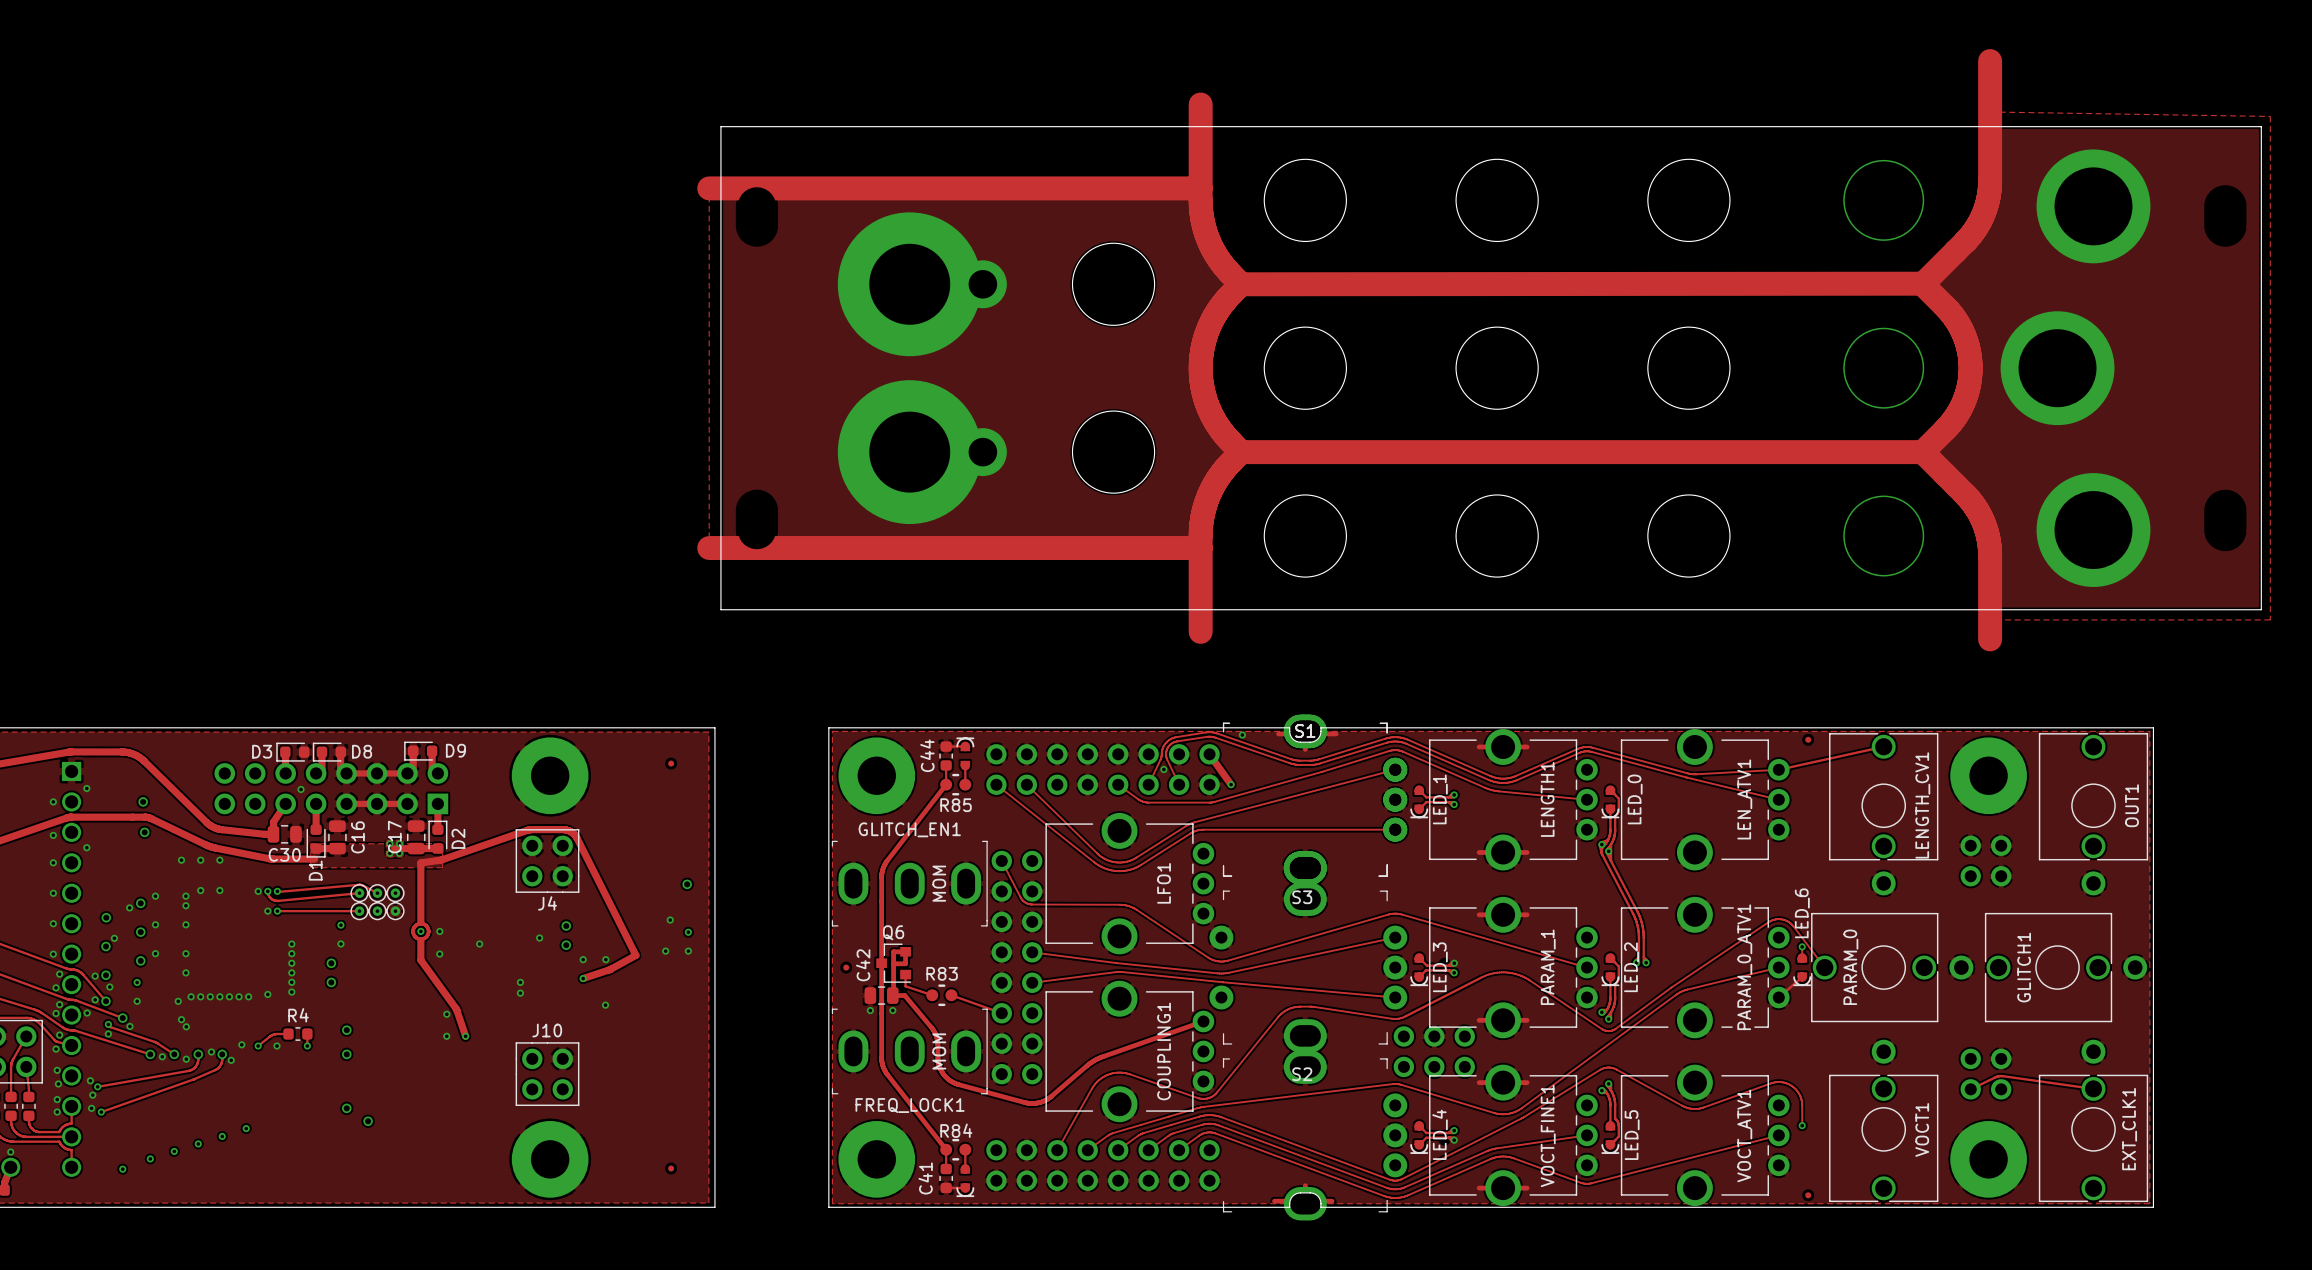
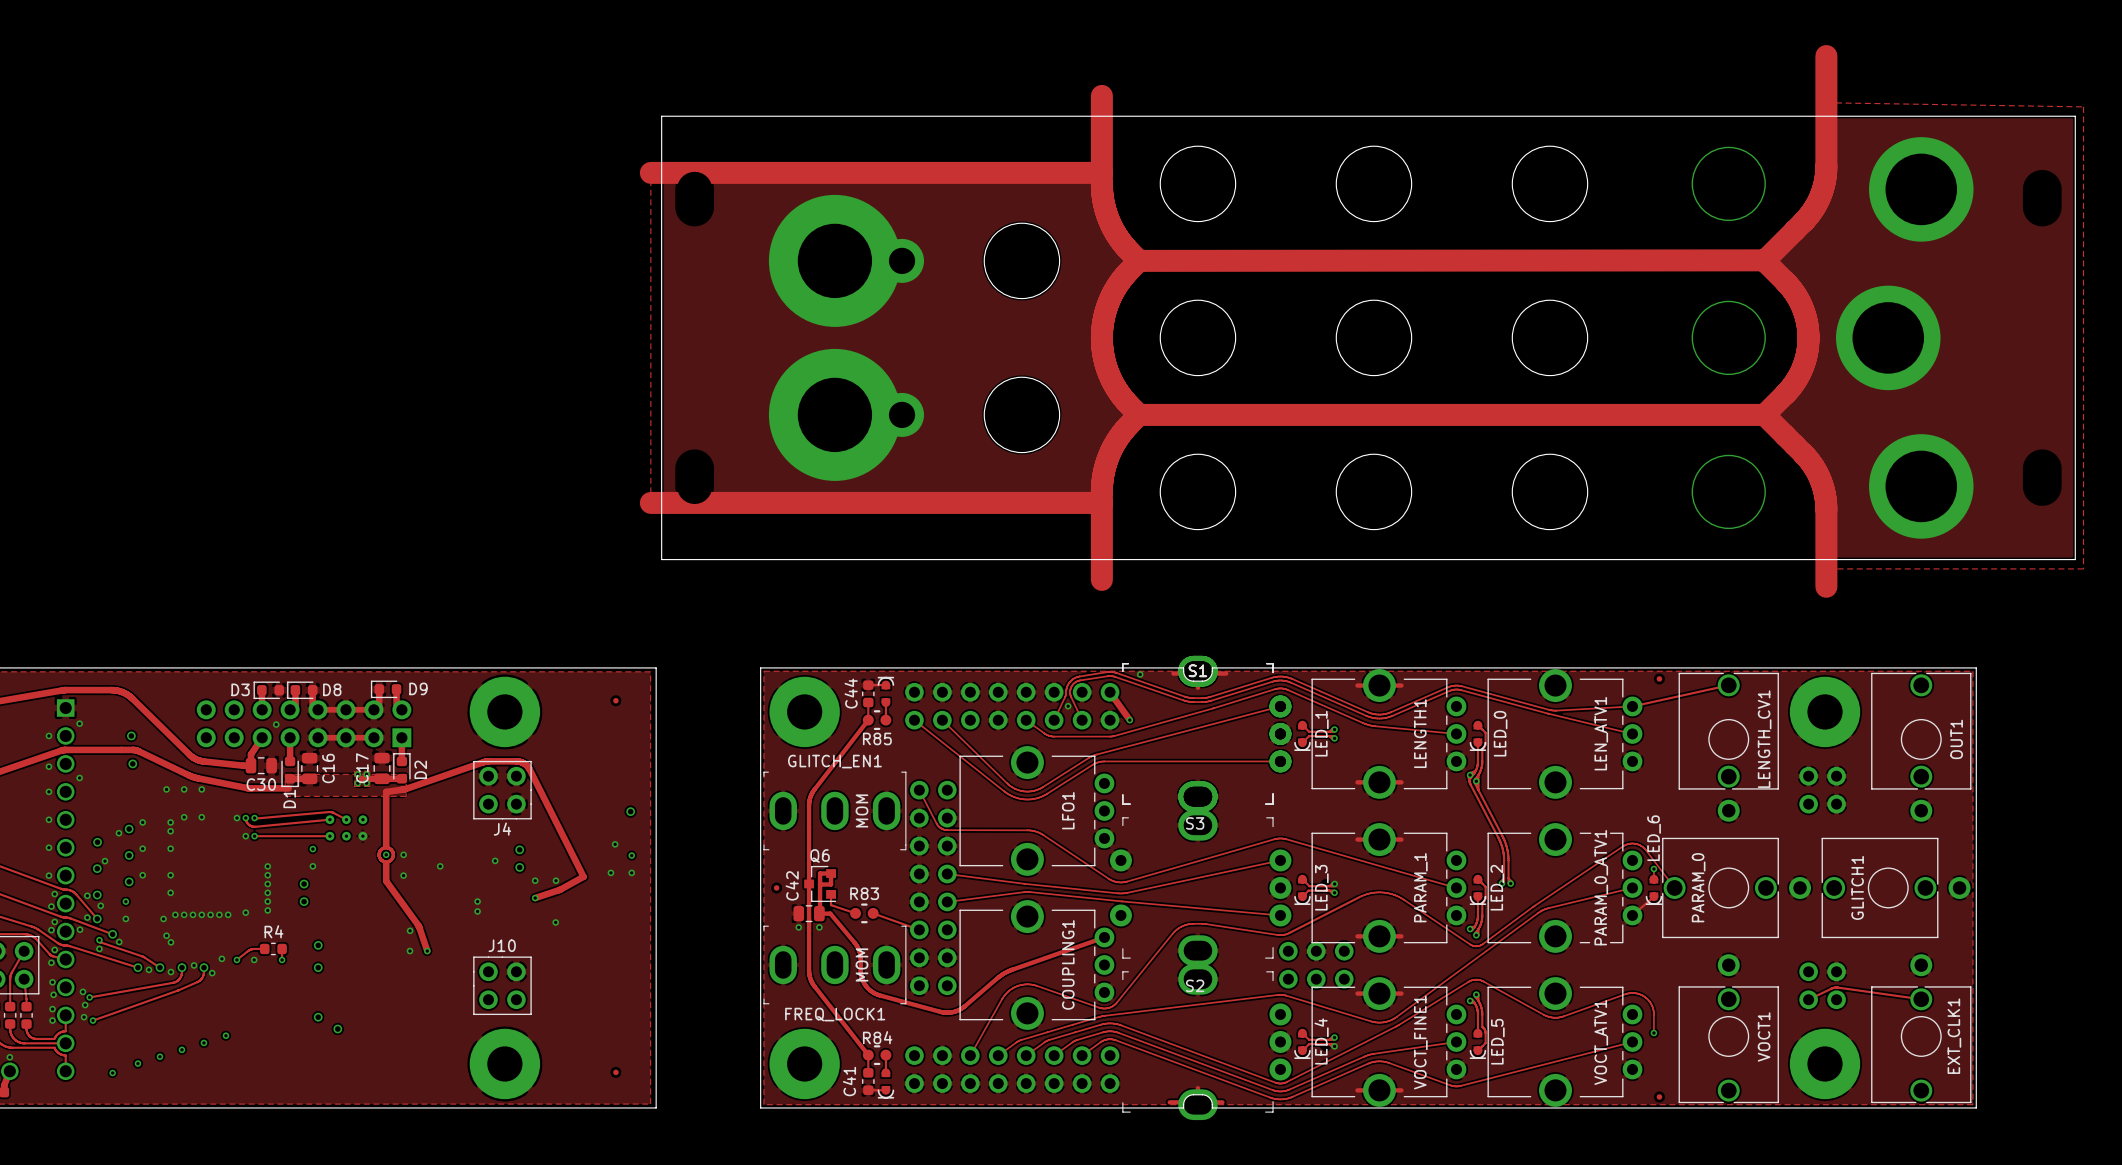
part footprint: [350, 884, 369, 903] -> [325, 815, 335, 825]
part footprint: [368, 884, 387, 903] -> [342, 815, 351, 825]
part footprint: [386, 884, 405, 903] -> [358, 815, 368, 825]
part footprint: [350, 902, 369, 921] -> [325, 831, 335, 841]
part footprint: [368, 902, 387, 921] -> [342, 831, 351, 841]
part footprint: [386, 902, 405, 921] -> [358, 831, 368, 841]

